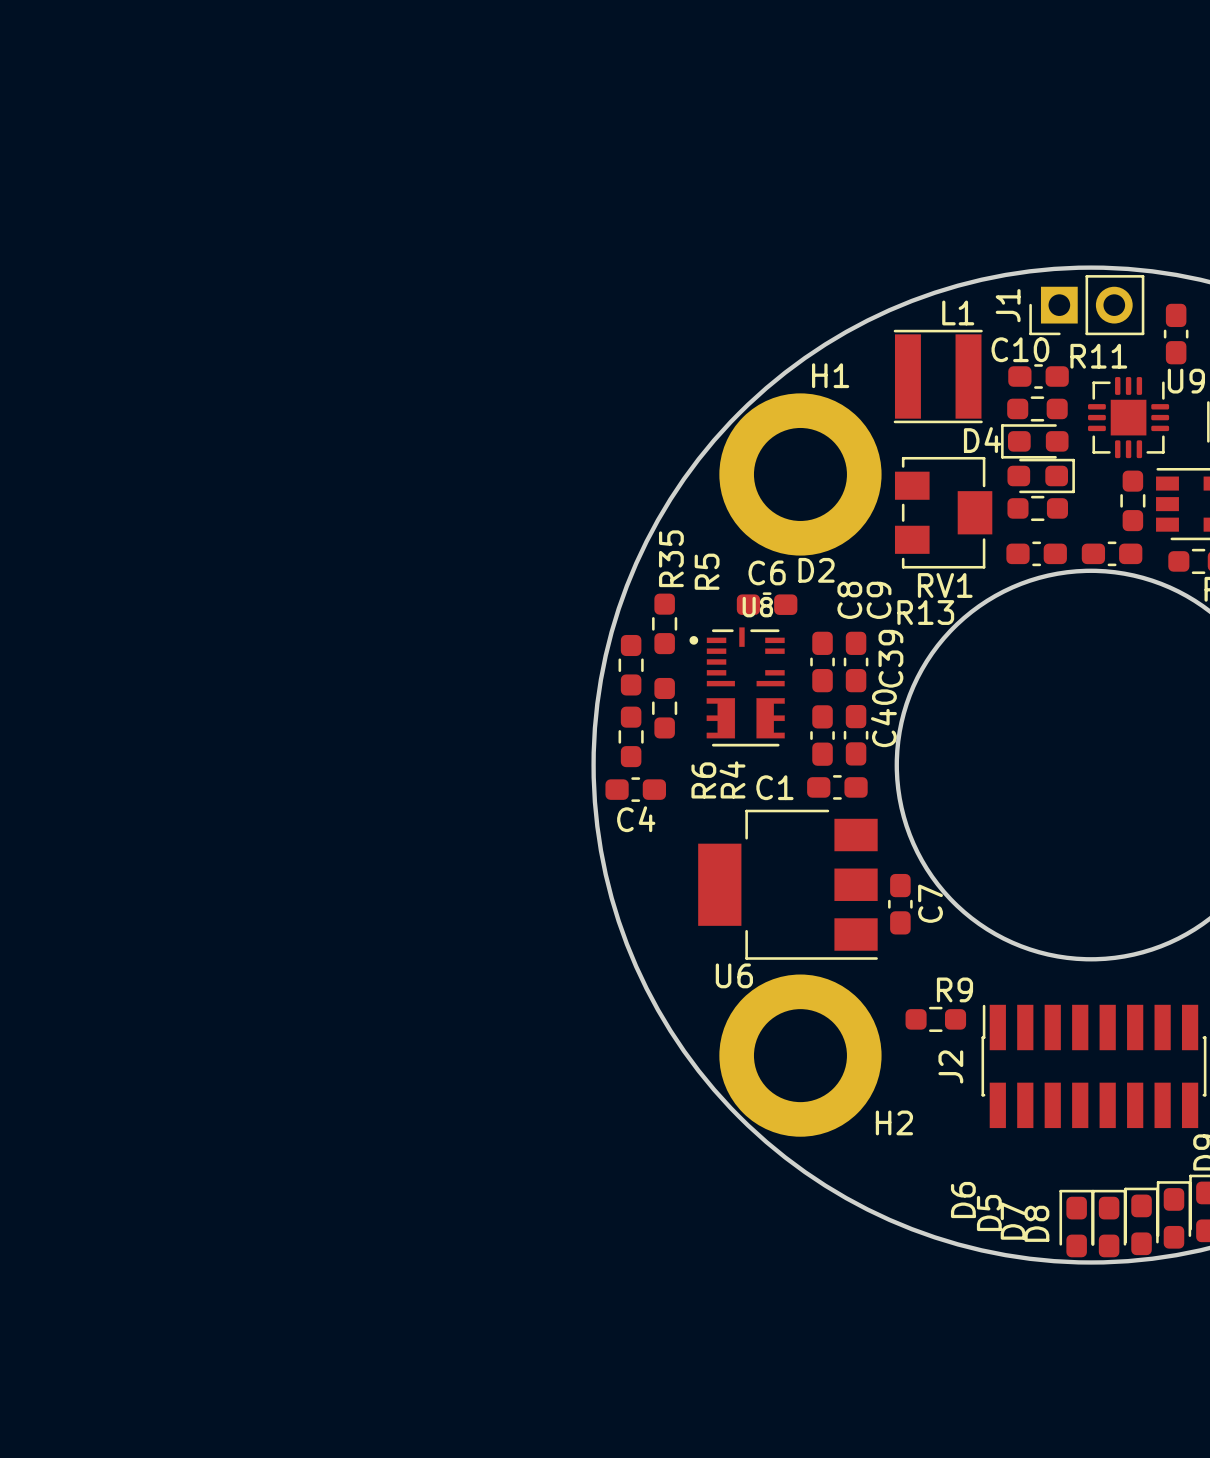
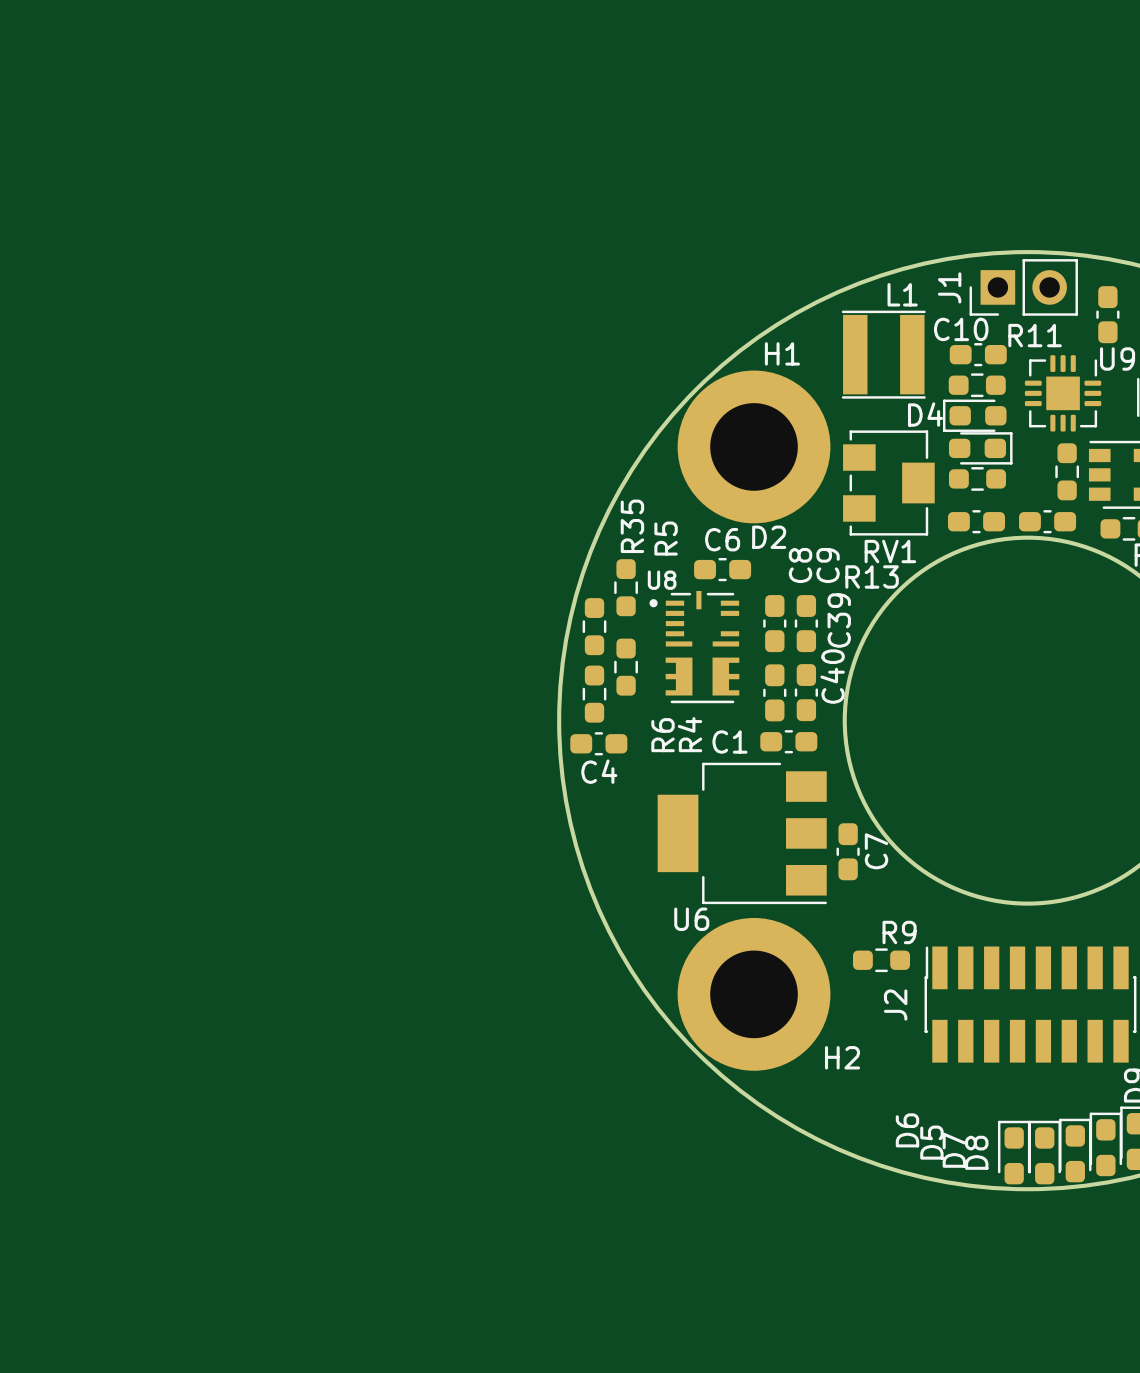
U8 name position: U8 (757, 607) -> U8 (662, 580)

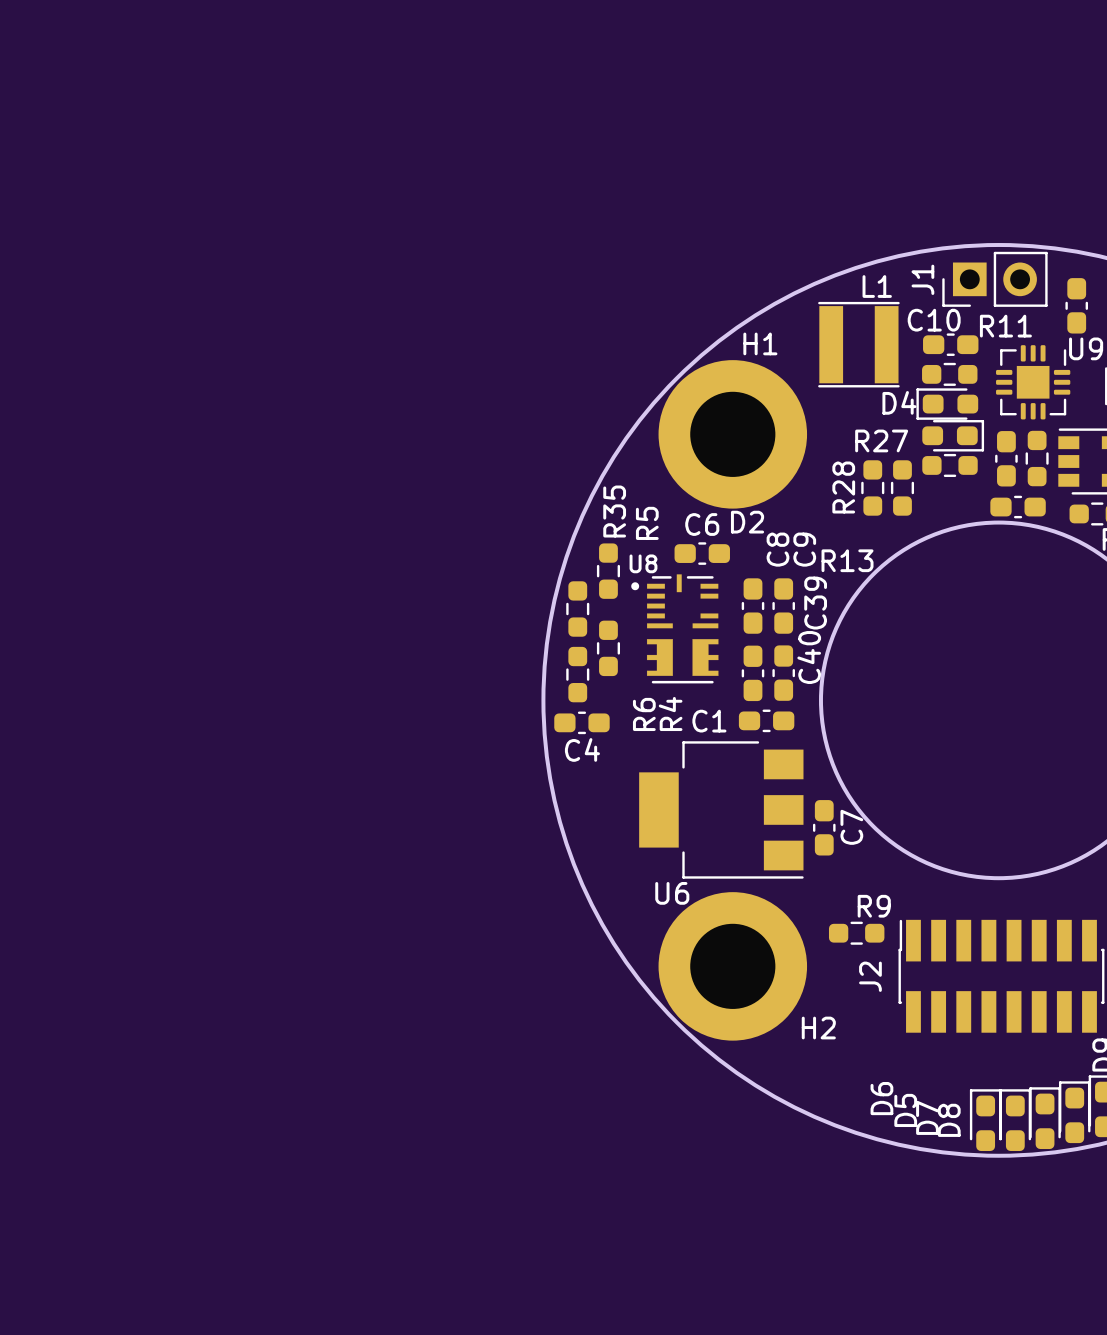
RV1: (888, 483) -> none
R28: none -> (872, 487)
R27: none -> (902, 487)
part rotation: 0° (976, 521) -> 90° clockwise (1006, 458)
part position: (976, 521) -> (1006, 458)

